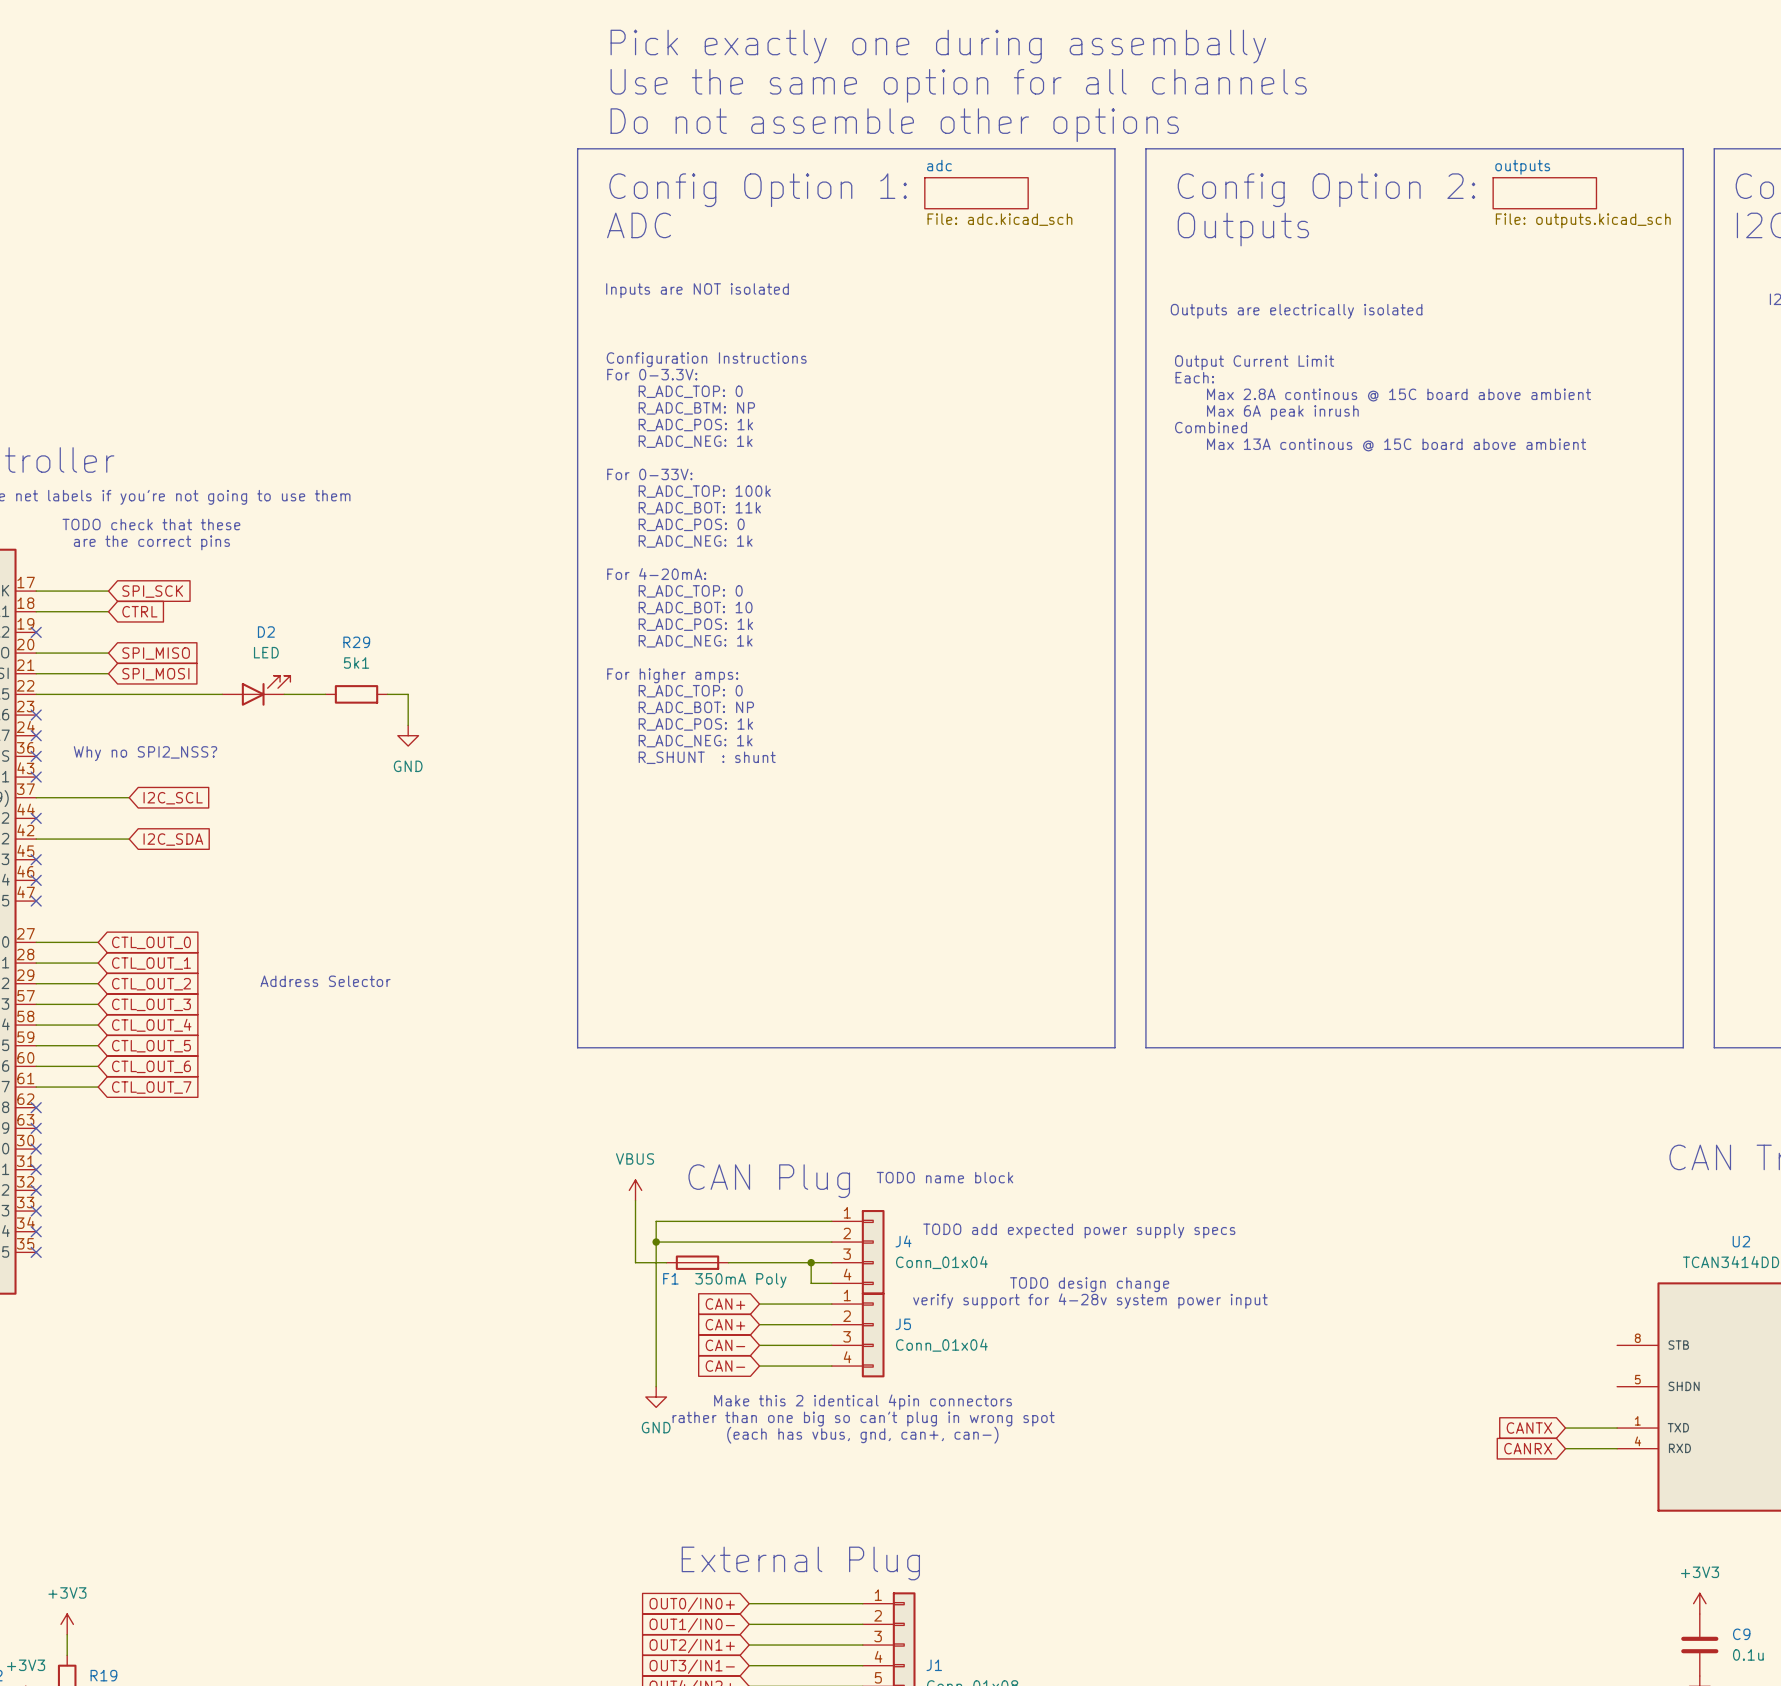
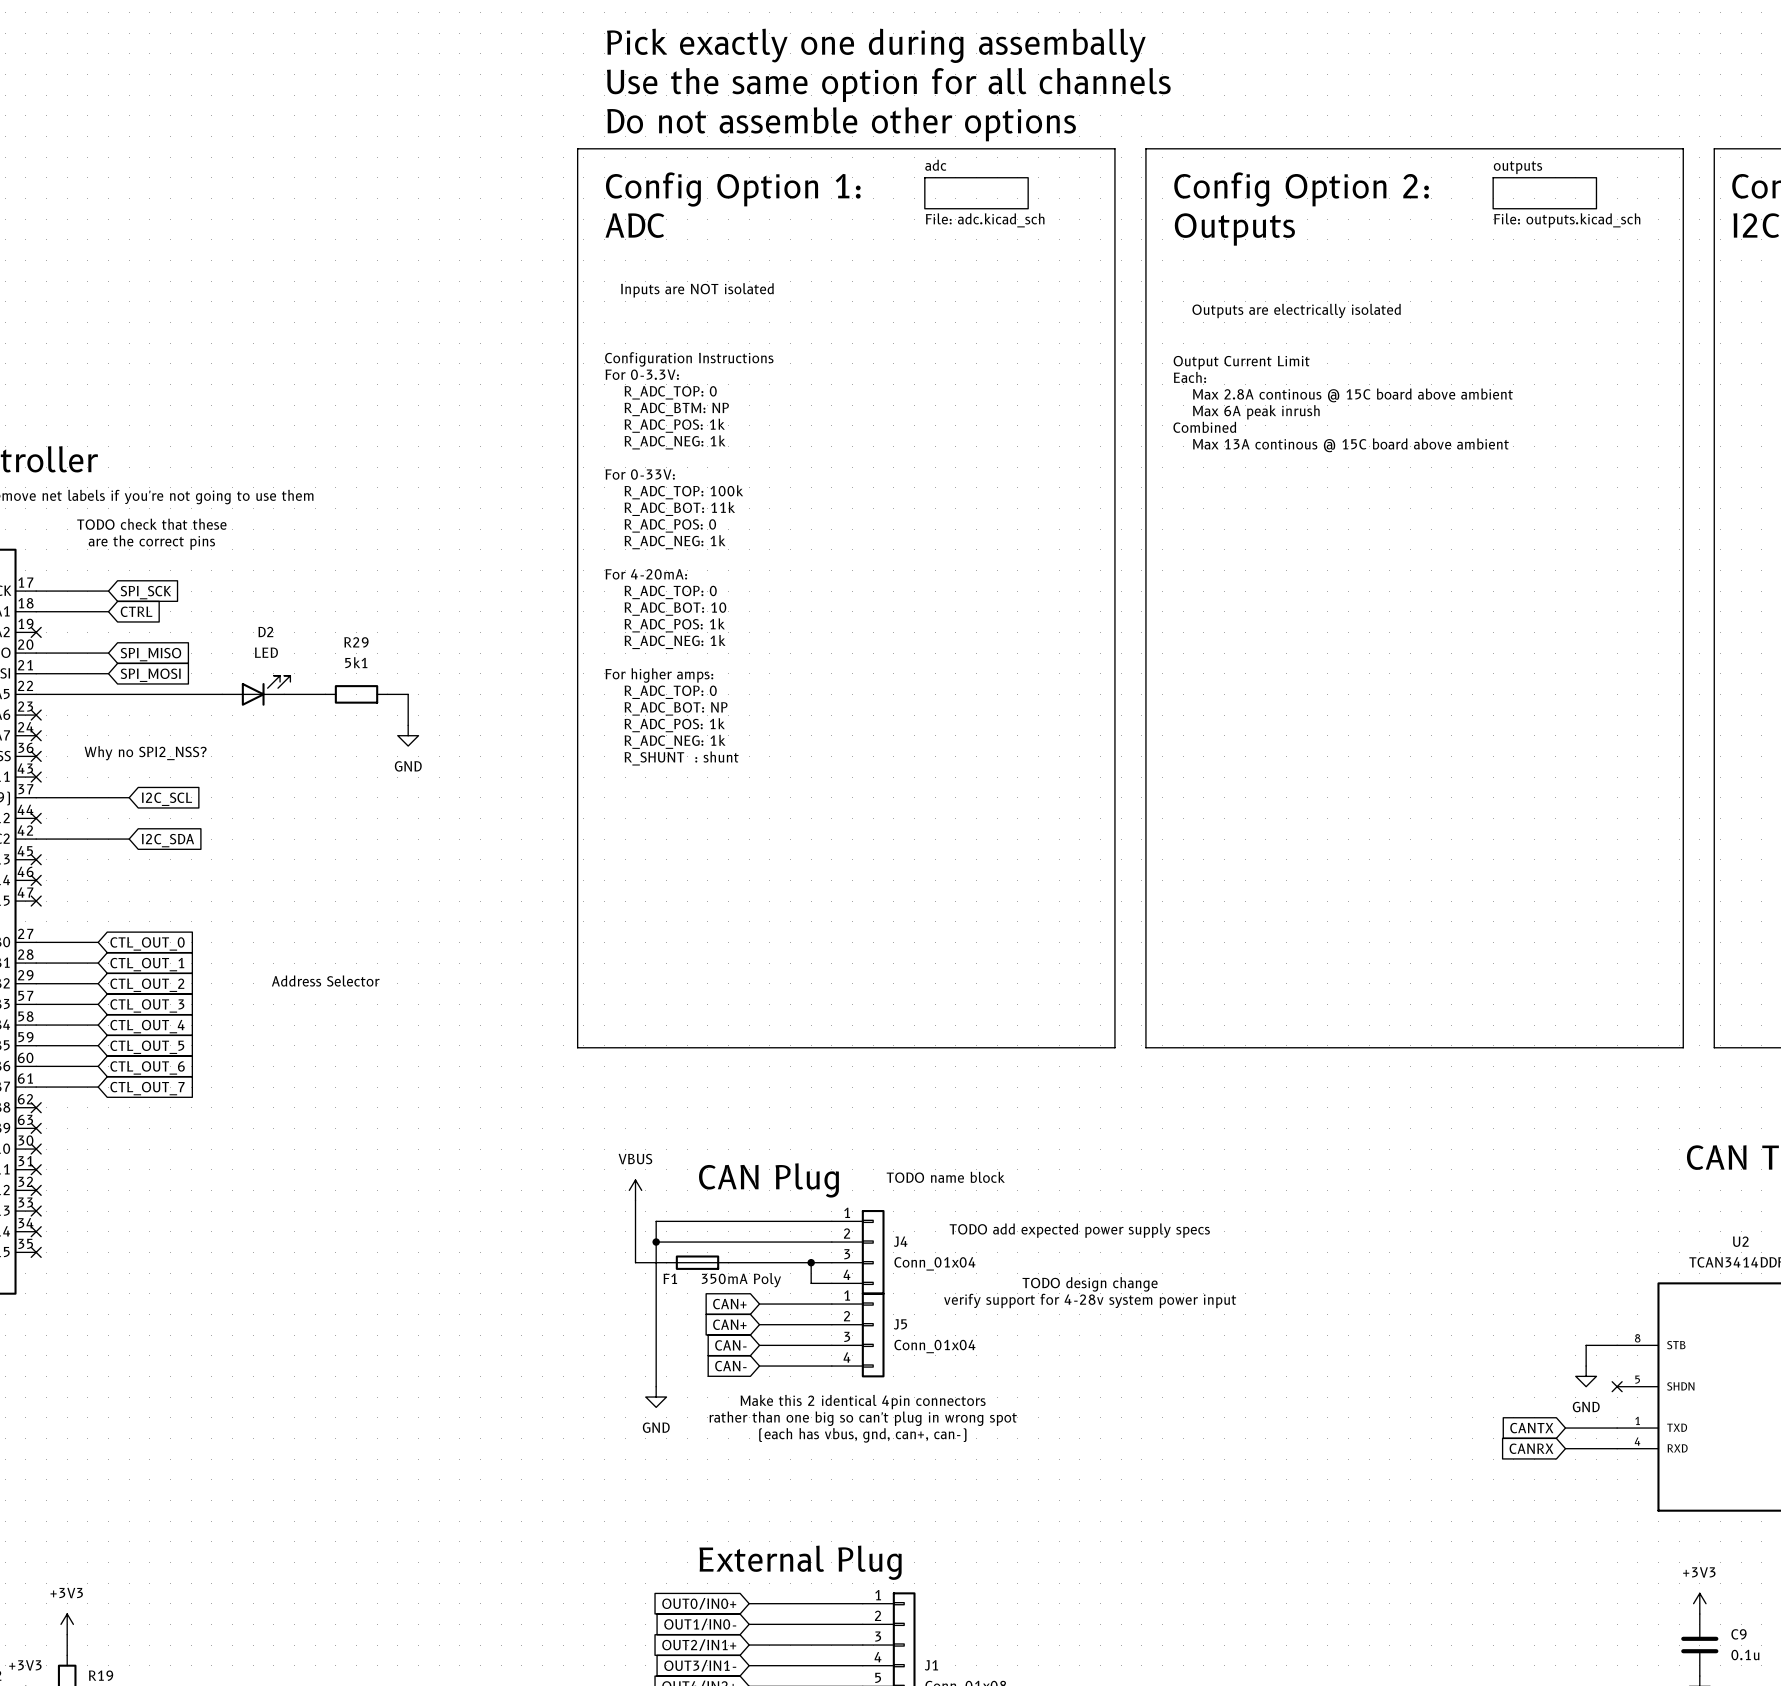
wire: none -> (1617, 1345) (1586, 1345) (1586, 1366)
power symbol: none -> GND (1586, 1376)
no-connect mark: none -> (1617, 1386)

